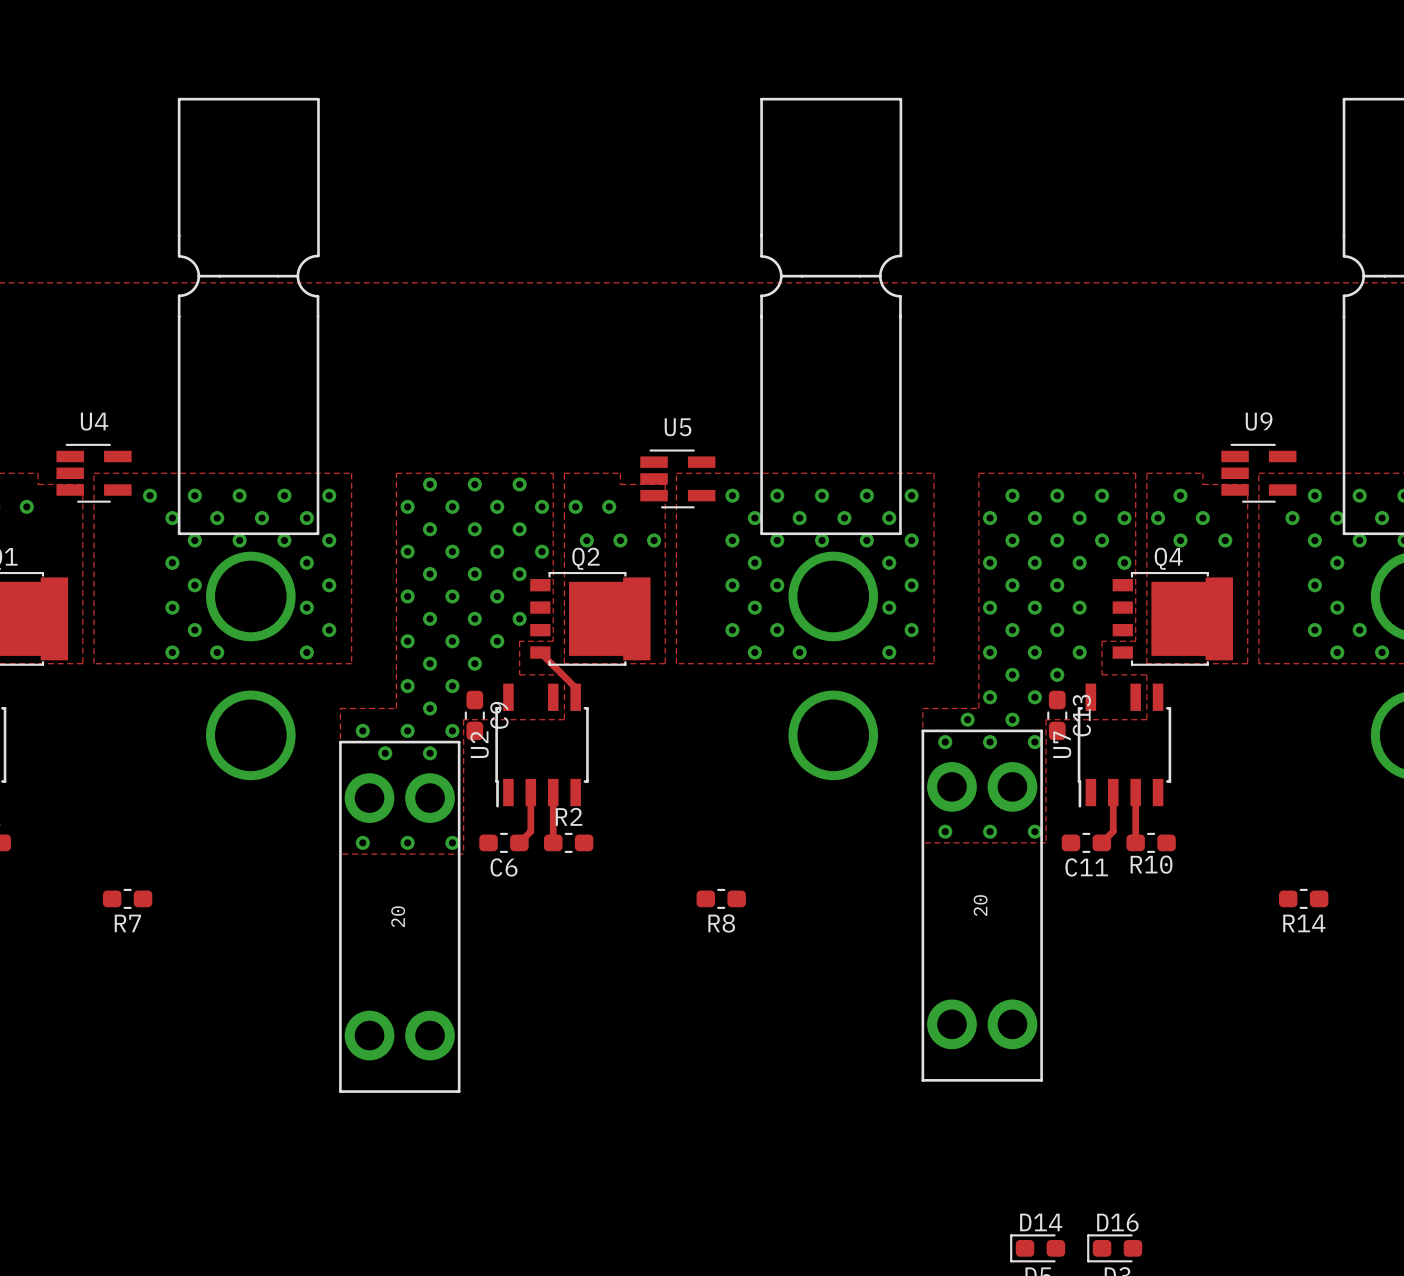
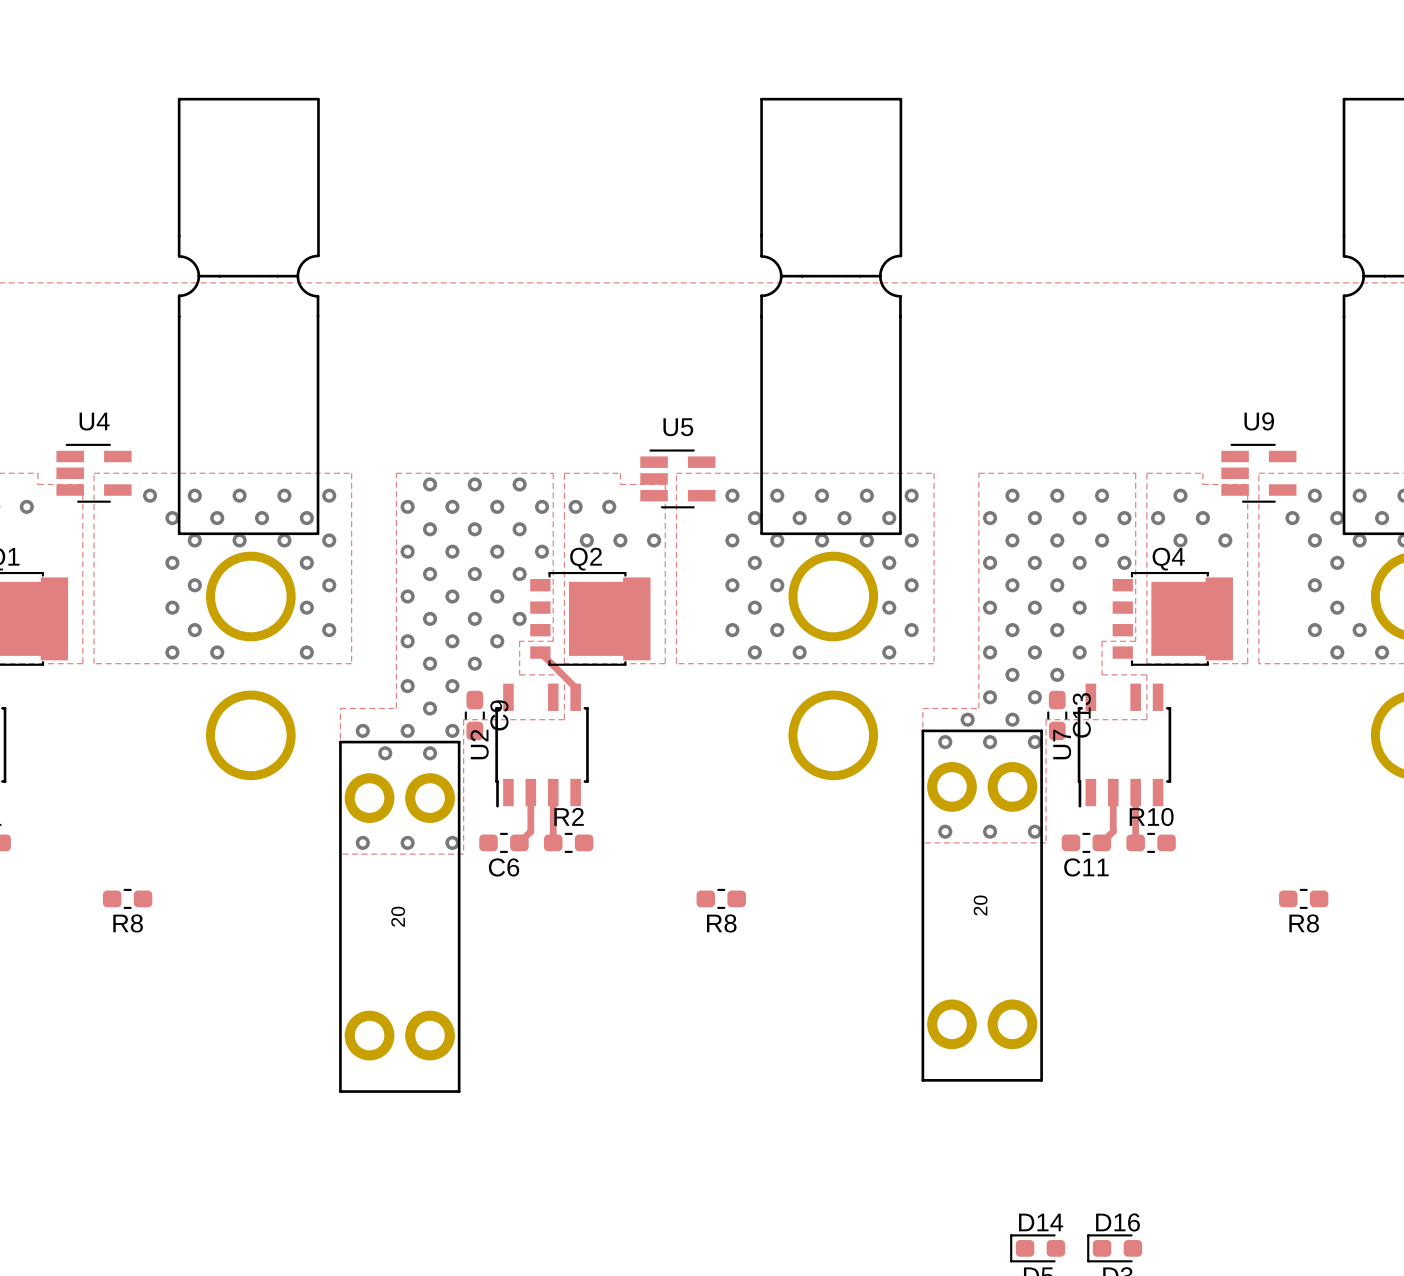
R10 name position: R10 (1151, 864) -> R10 (1151, 817)
R7 name: R7 (127, 923) -> R8 (128, 923)
R14 name: R14 (1304, 923) -> R8 (1304, 923)

